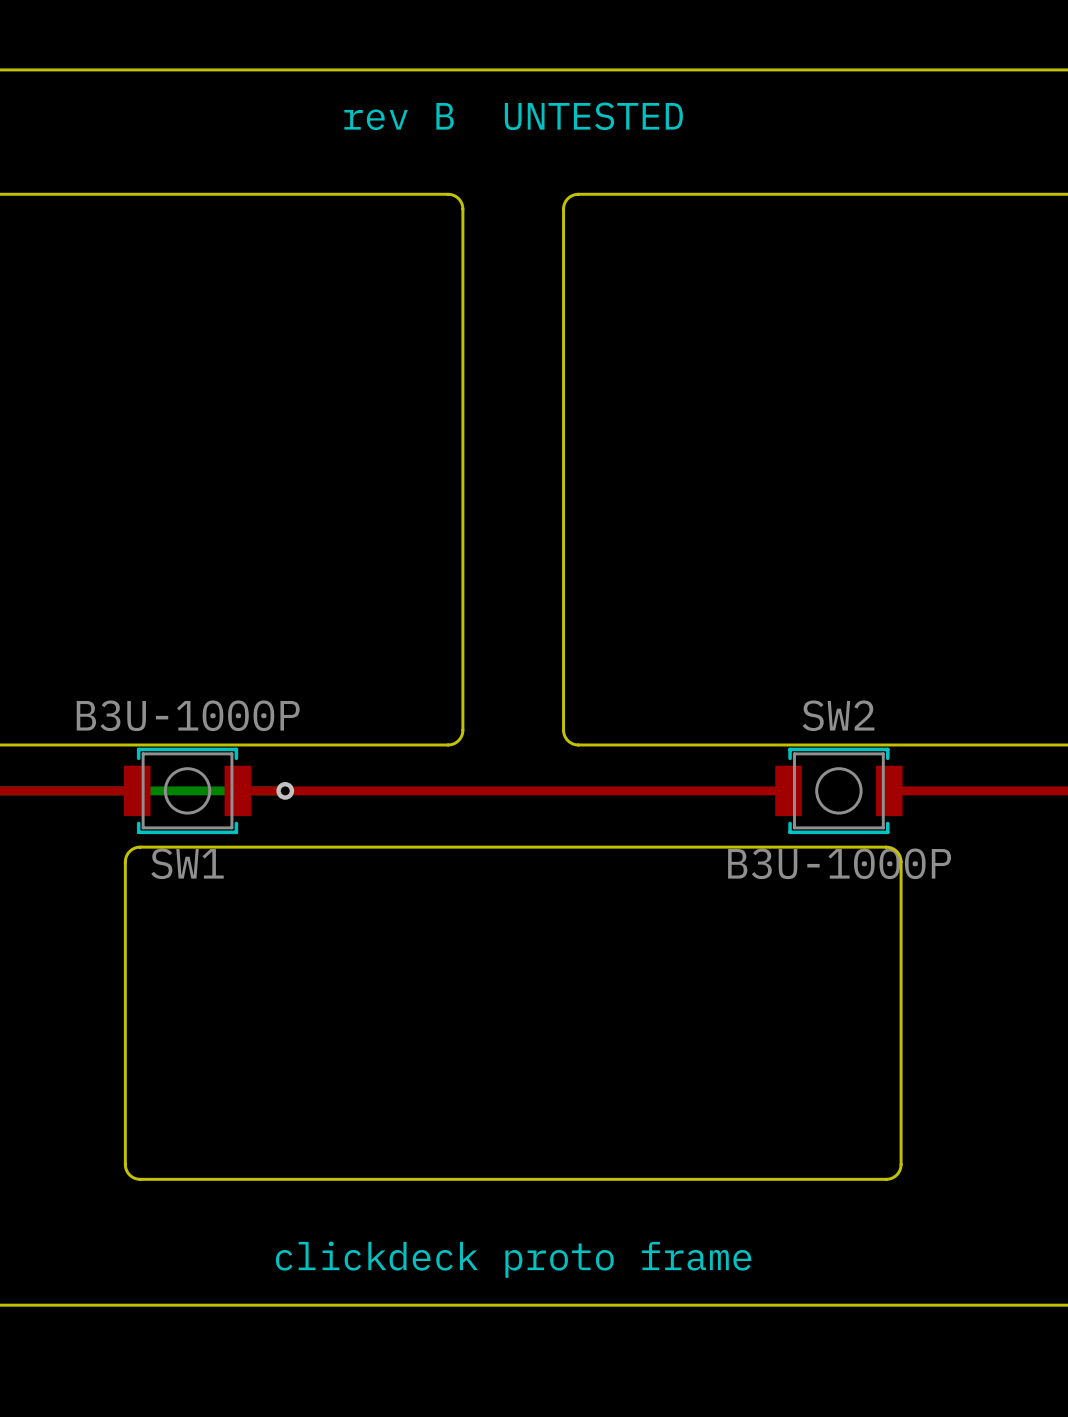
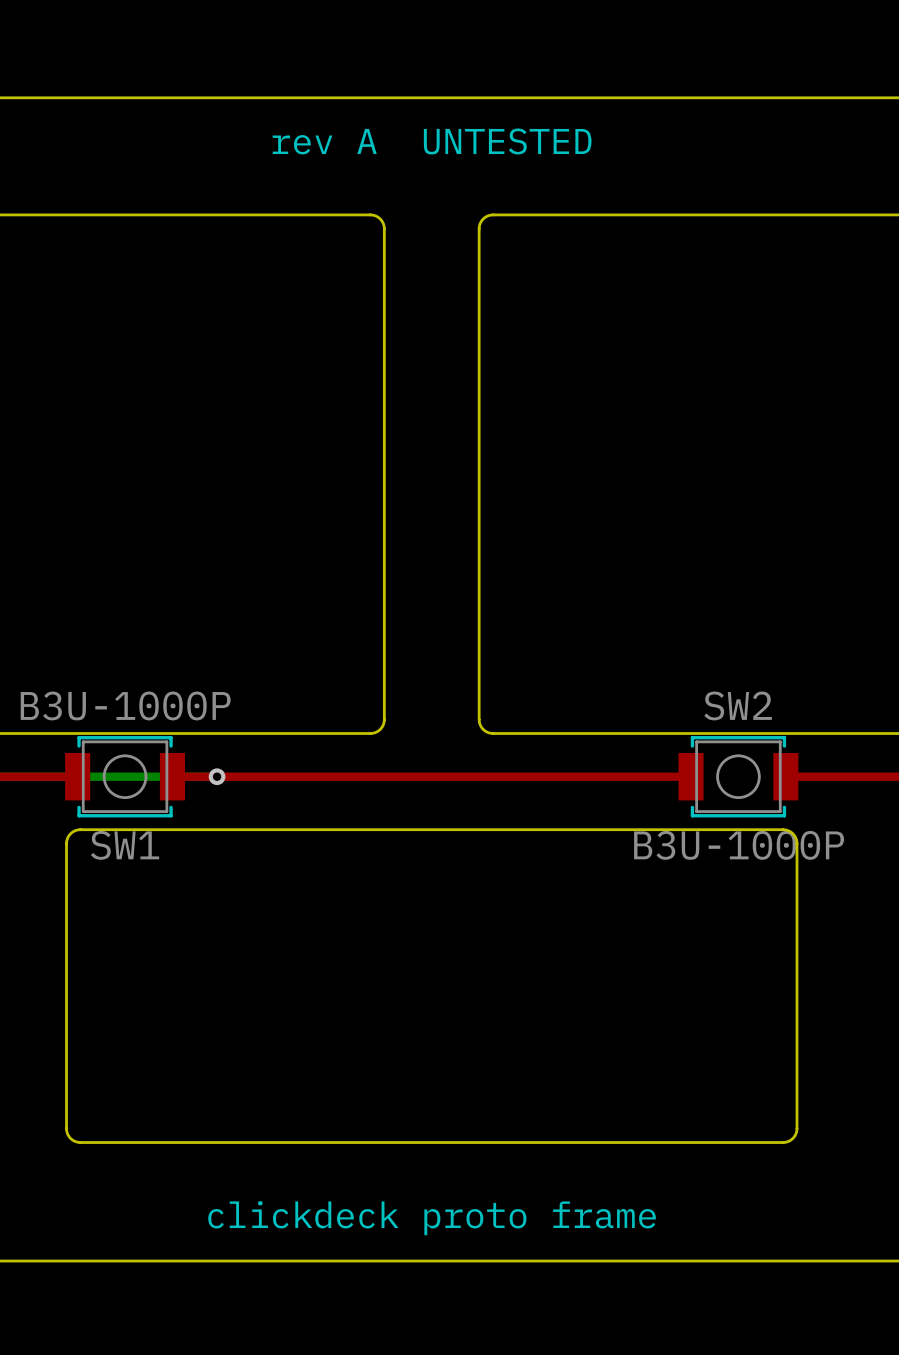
text: rev B UNTESTED (513, 116) -> rev A UNTESTED (432, 141)

